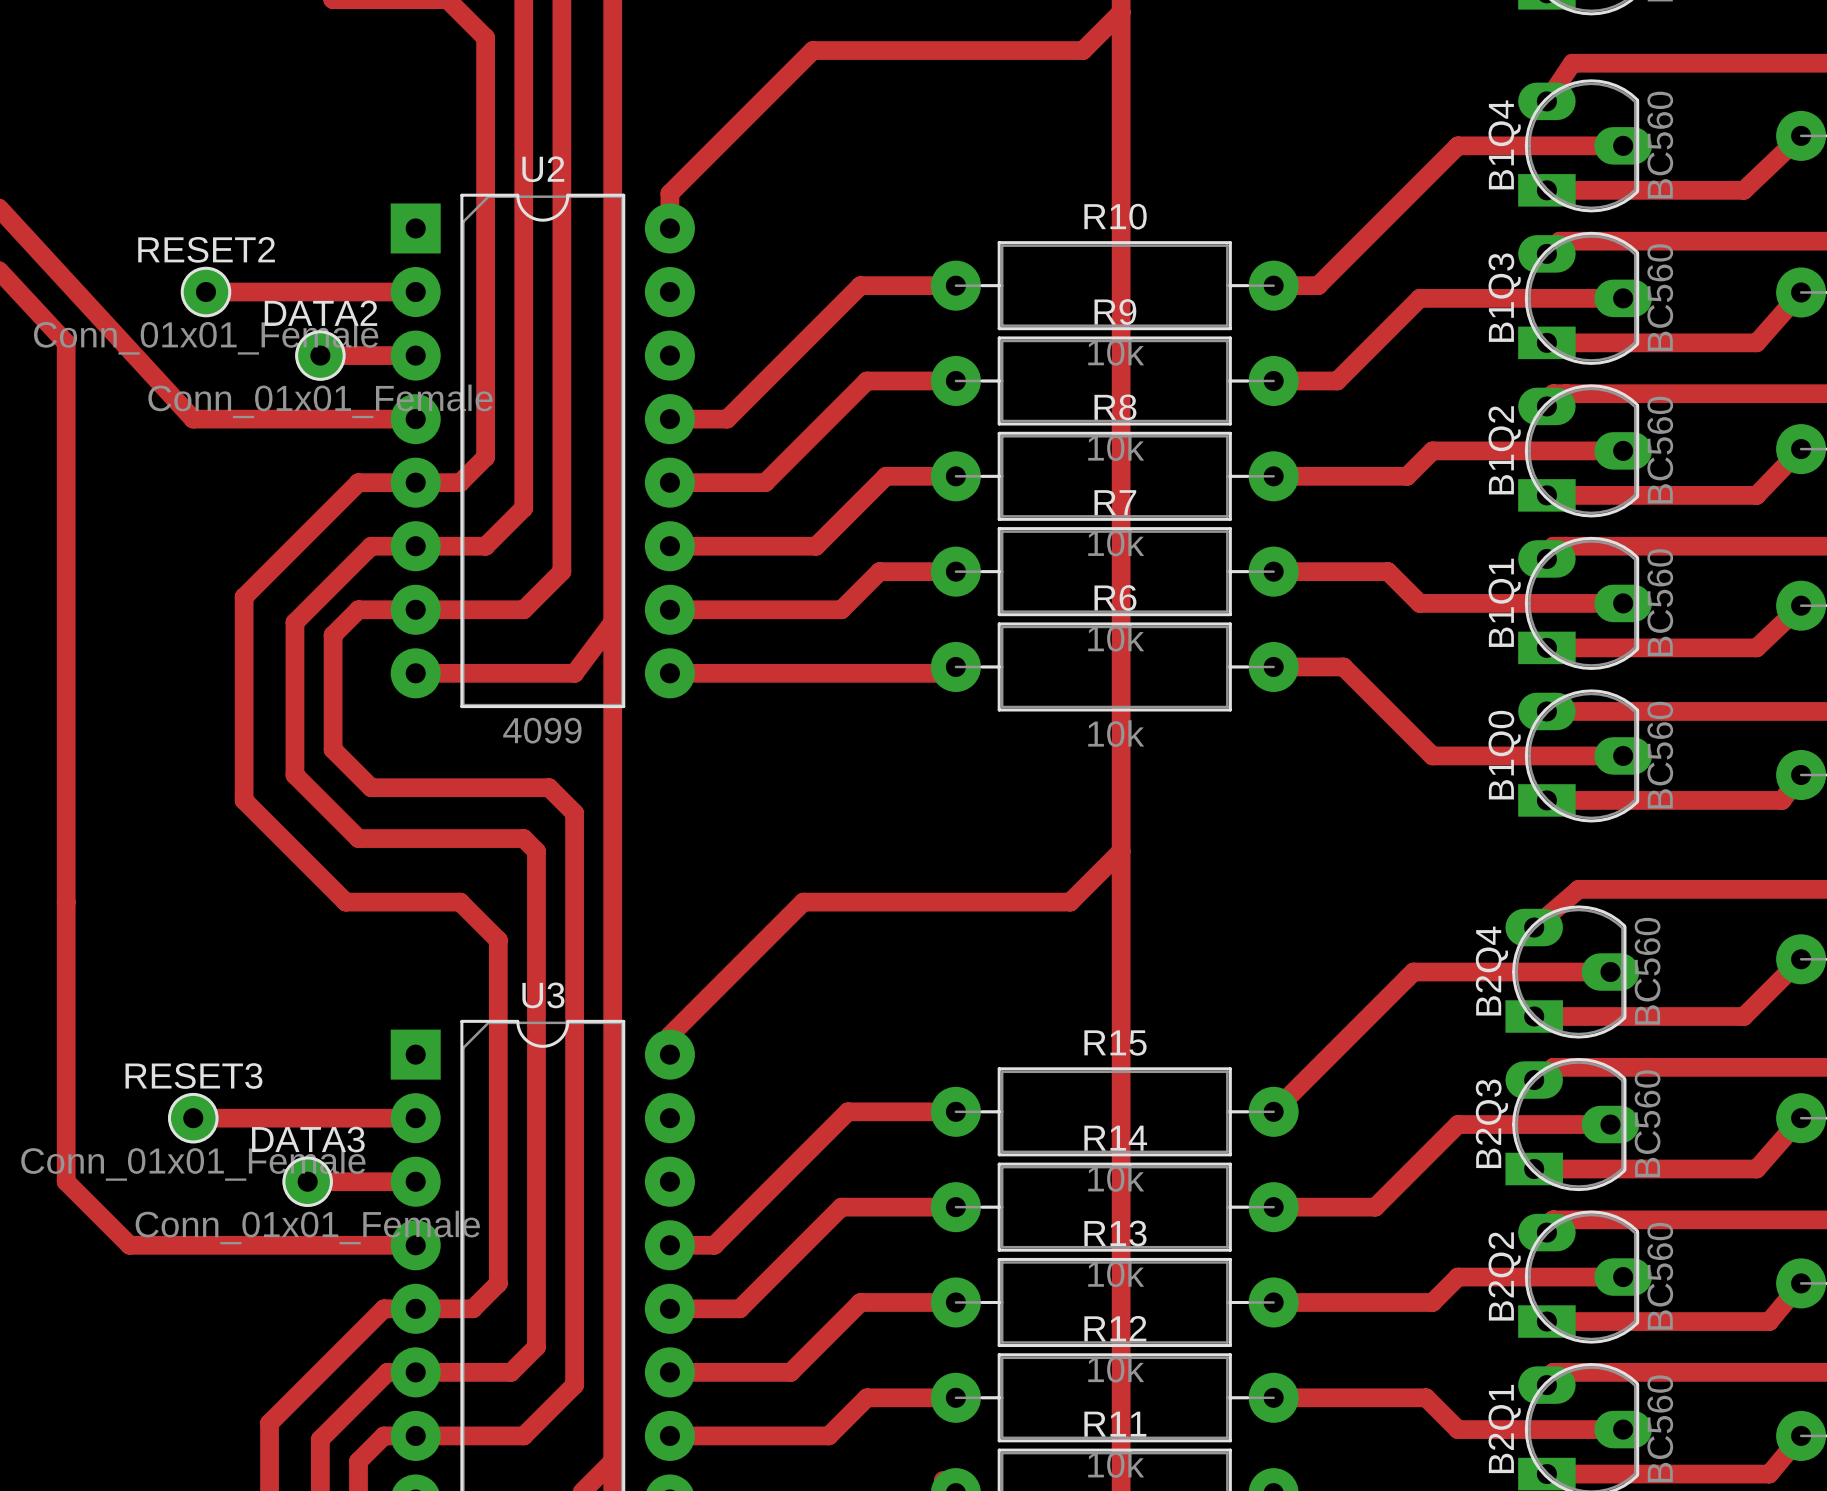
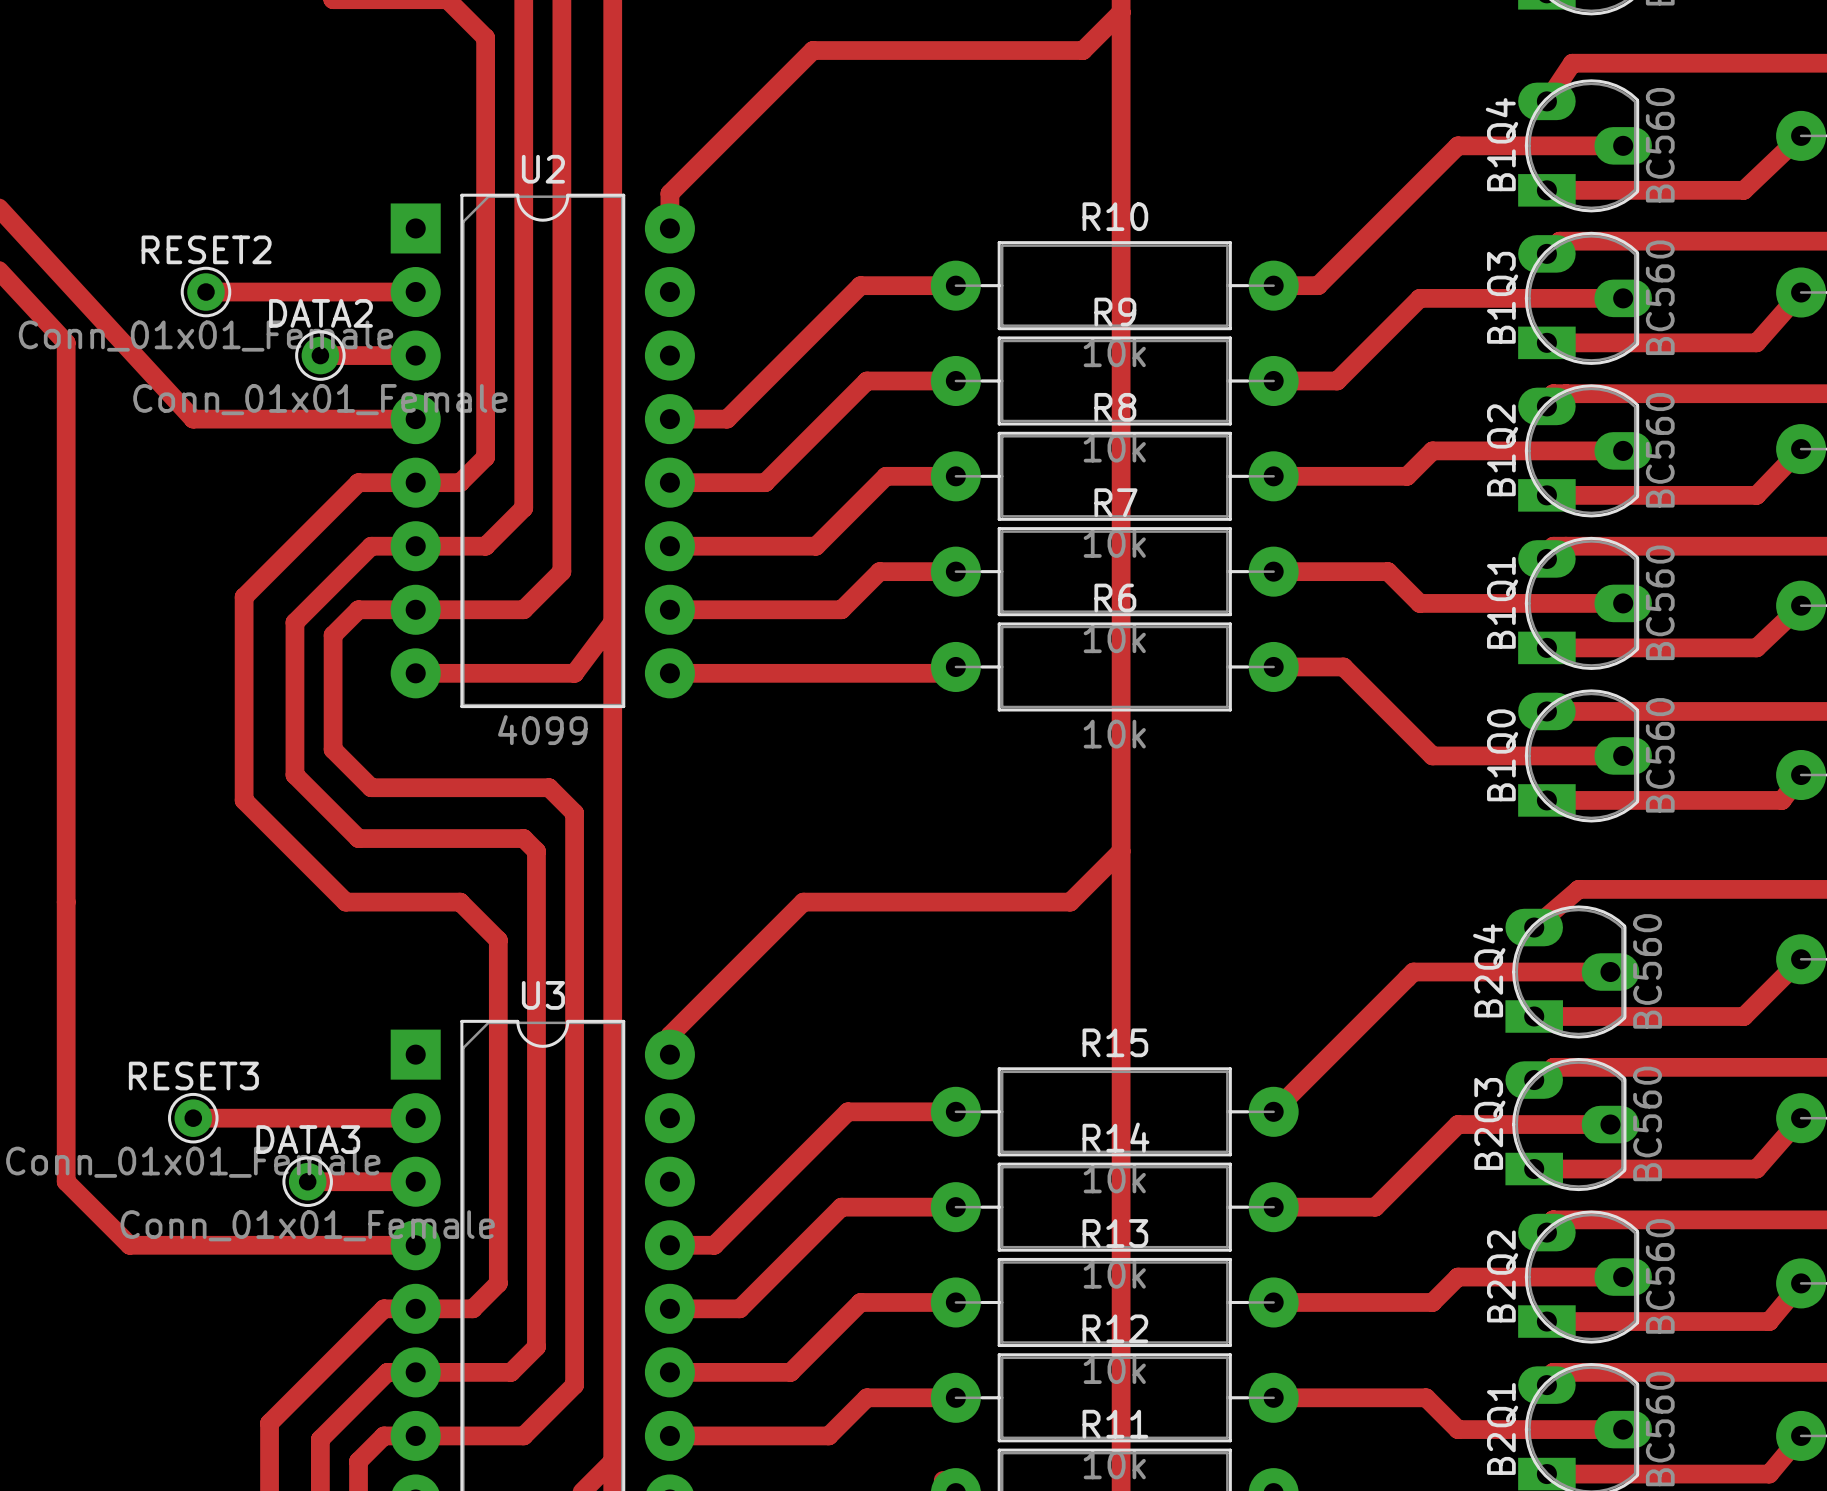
RESET2 footprint: [180, 266, 232, 318] -> [180, 266, 232, 318]
DATA2 footprint: [295, 330, 346, 381] -> [295, 330, 346, 381]
RESET3 footprint: [168, 1092, 219, 1144] -> [168, 1092, 219, 1144]
DATA3 footprint: [282, 1156, 333, 1208] -> [282, 1156, 333, 1208]

